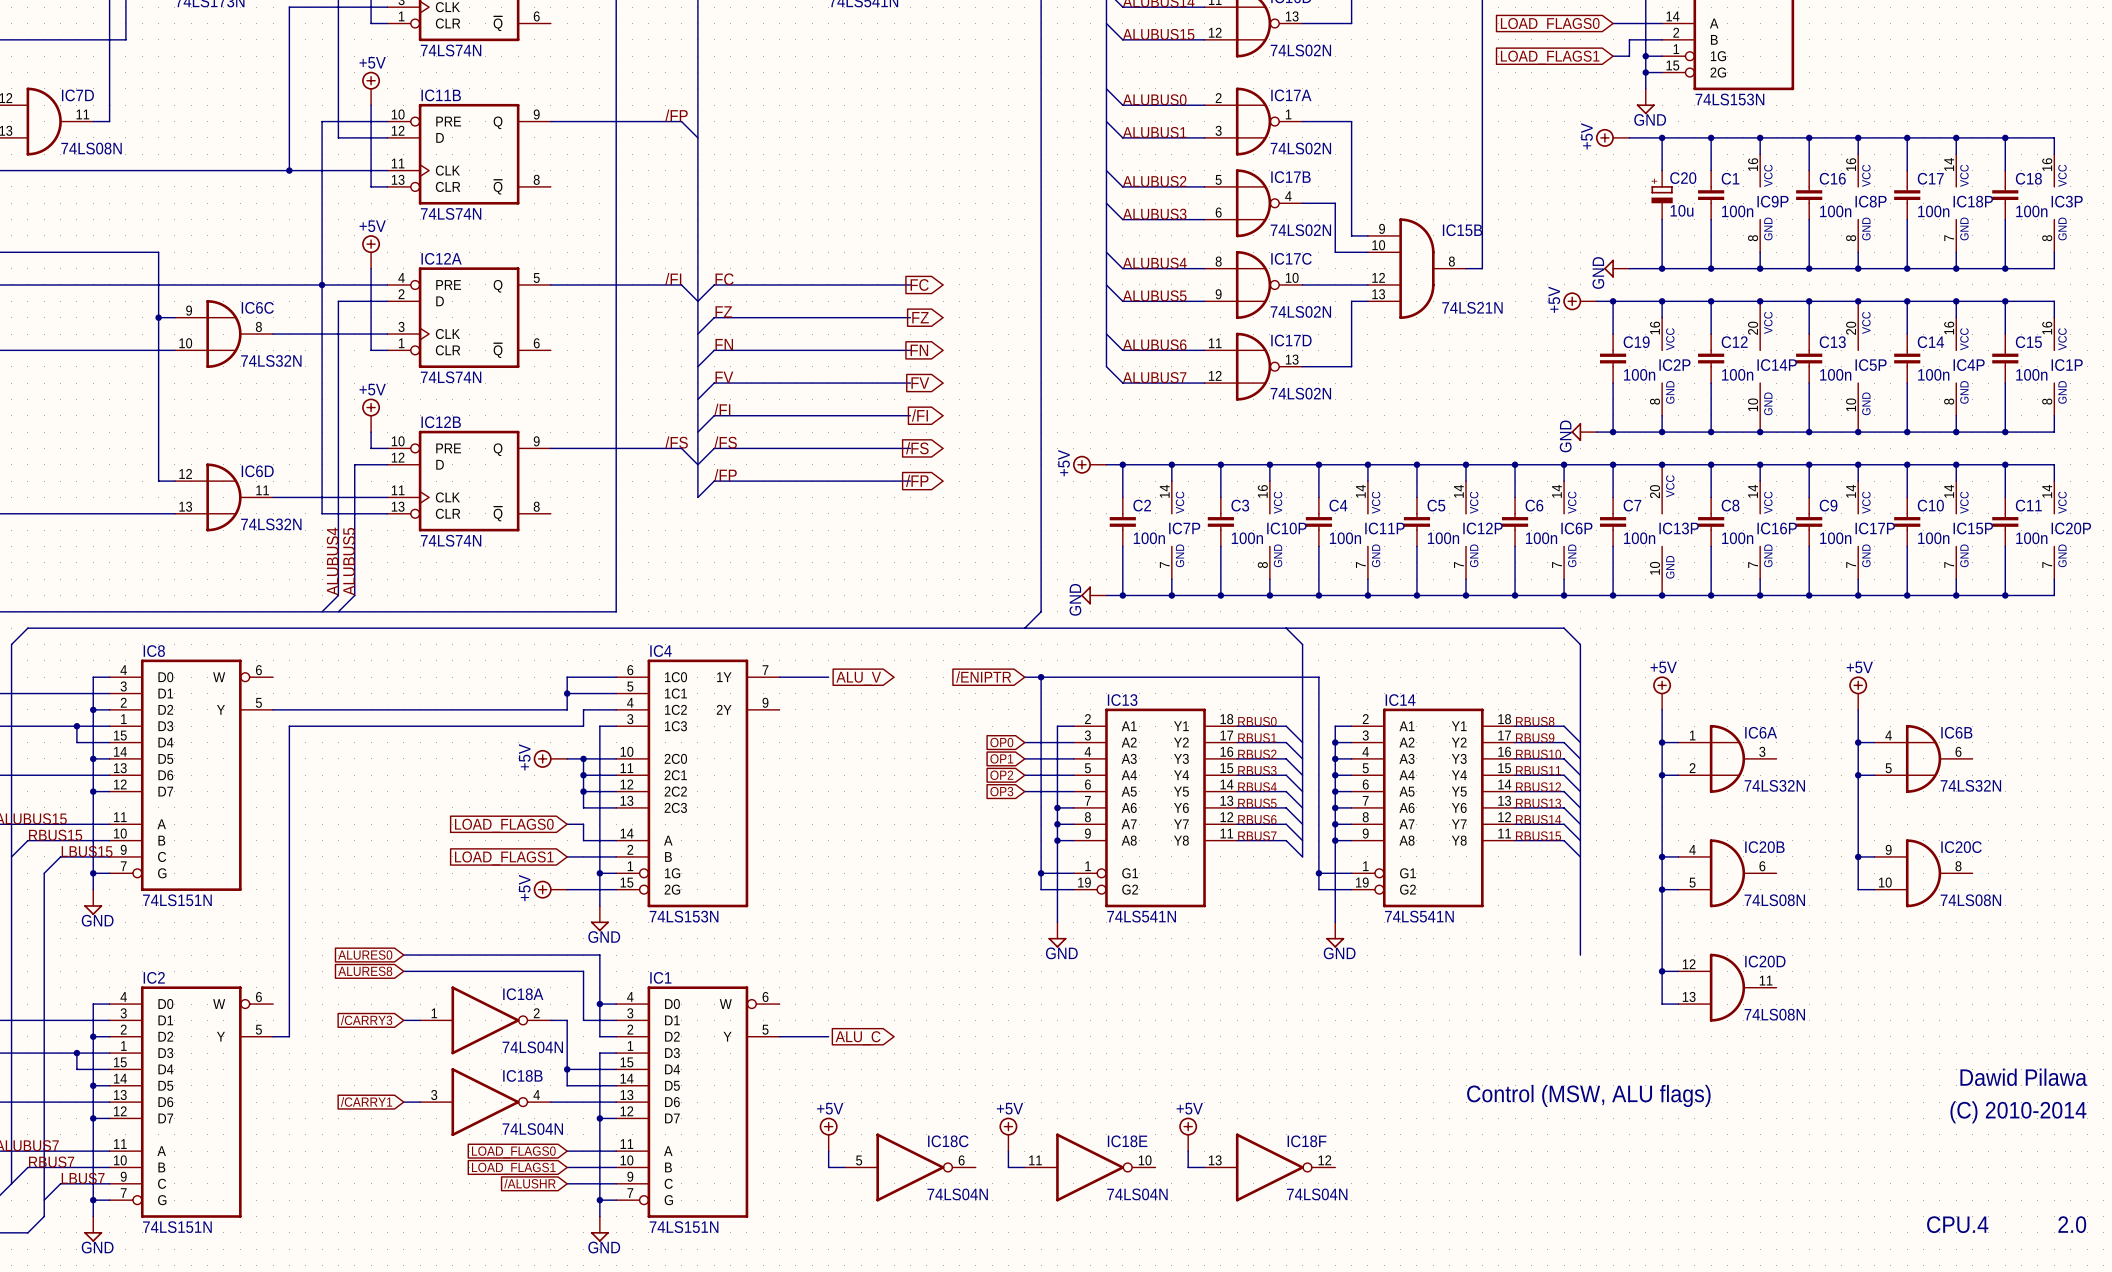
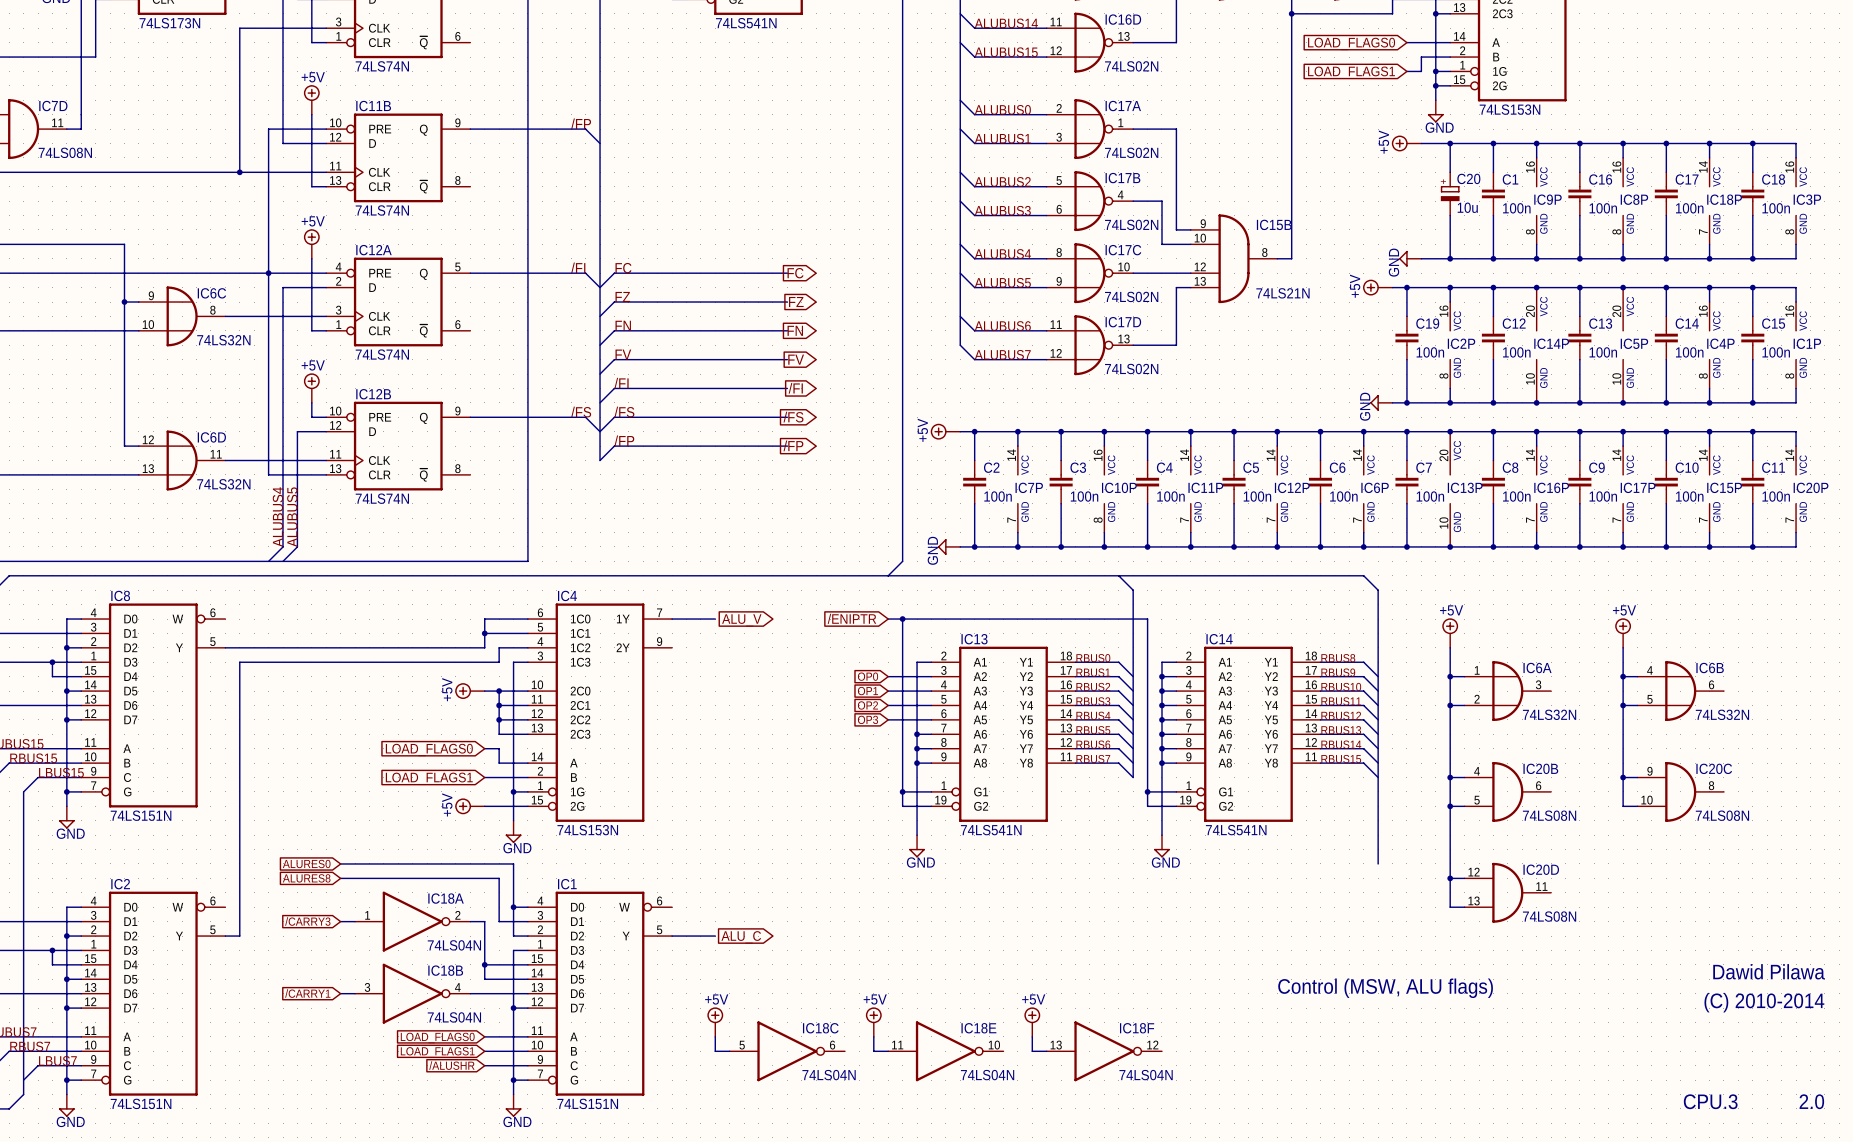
text: CPU.4 (1957, 1224) -> CPU.3 (1710, 1101)

